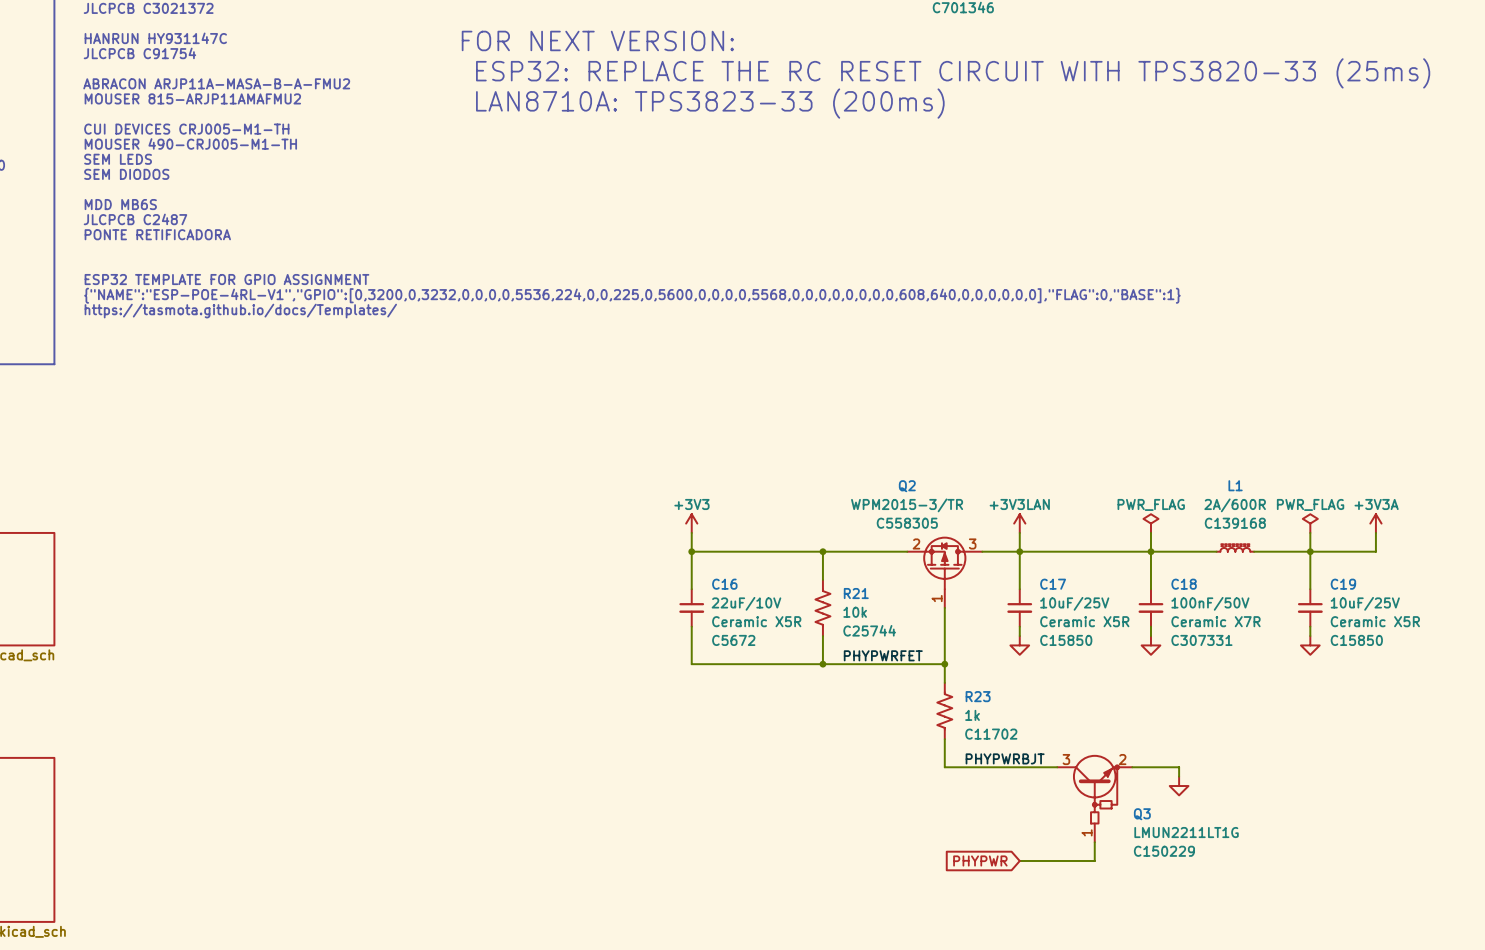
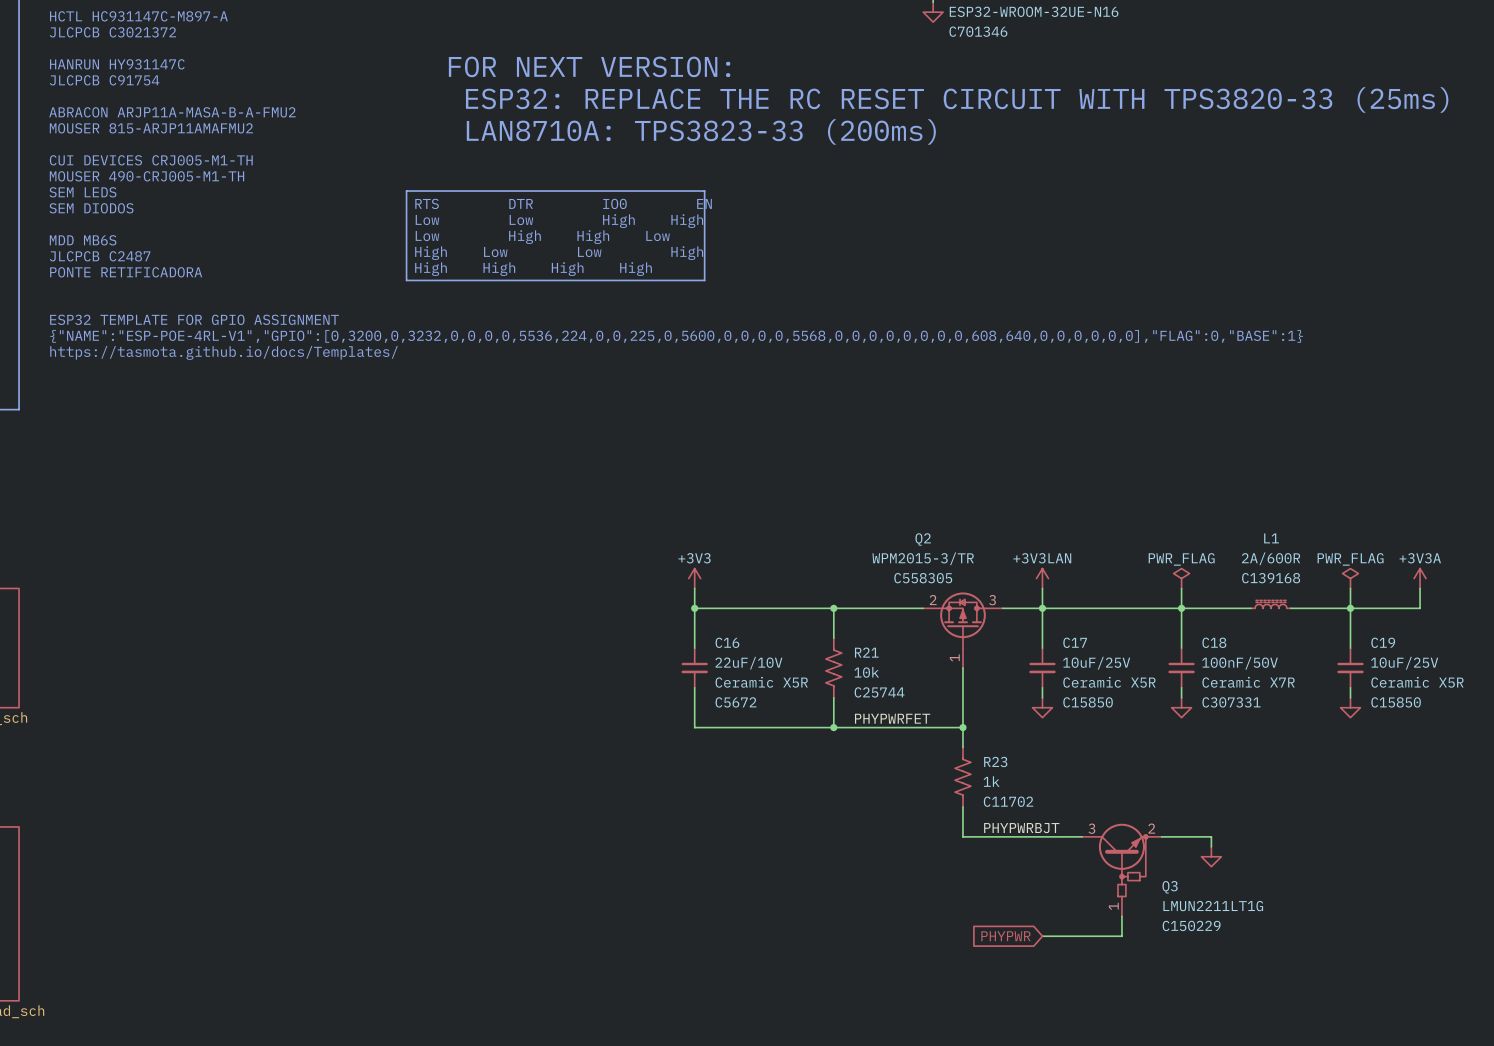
line: none -> (406, 191) (704, 191) (704, 280) (406, 280) (406, 191)
text: none -> RTS DTR IO0 EN (563, 203)
text: none -> Low Low High High (559, 221)
text: none -> Low High High Low (542, 237)
text: none -> High Low Low High (559, 253)
text: none -> High High High High (533, 269)

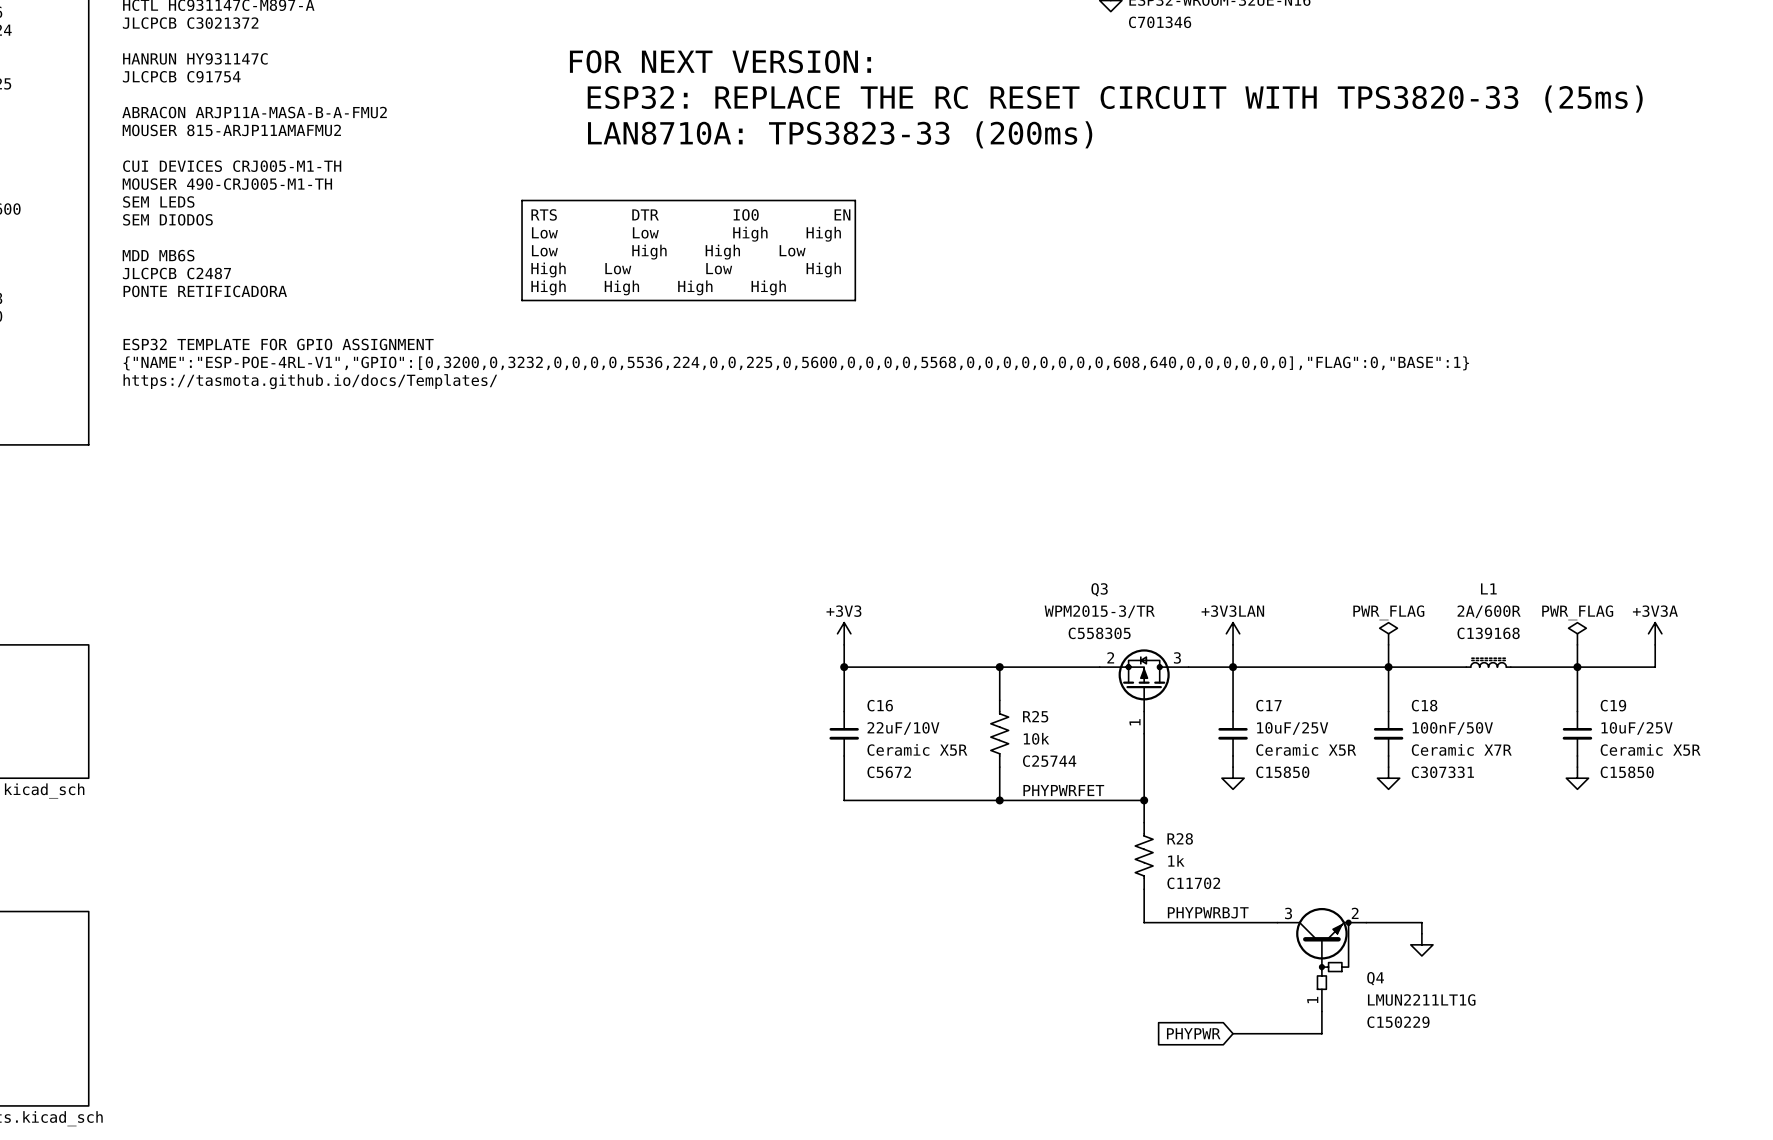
Q2 name: Q2 (923, 539) -> Q3 (1099, 589)
R21 name: R21 (866, 652) -> R25 (1035, 716)
R23 name: R23 (995, 761) -> R28 (1180, 838)
Q3 name: Q3 (1170, 887) -> Q4 (1375, 978)

